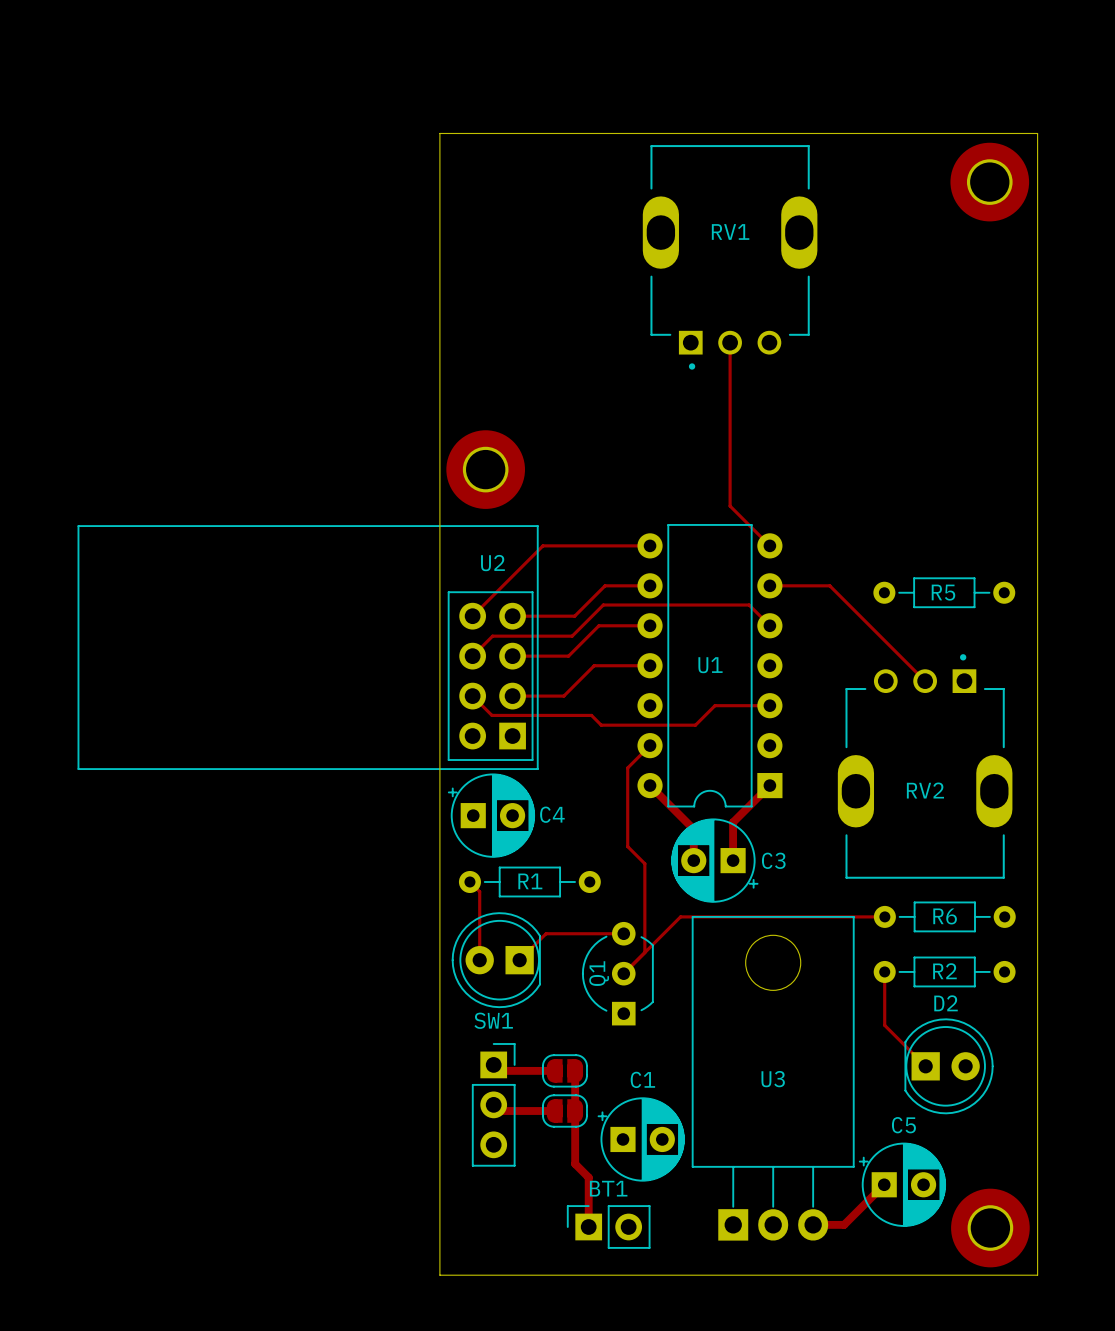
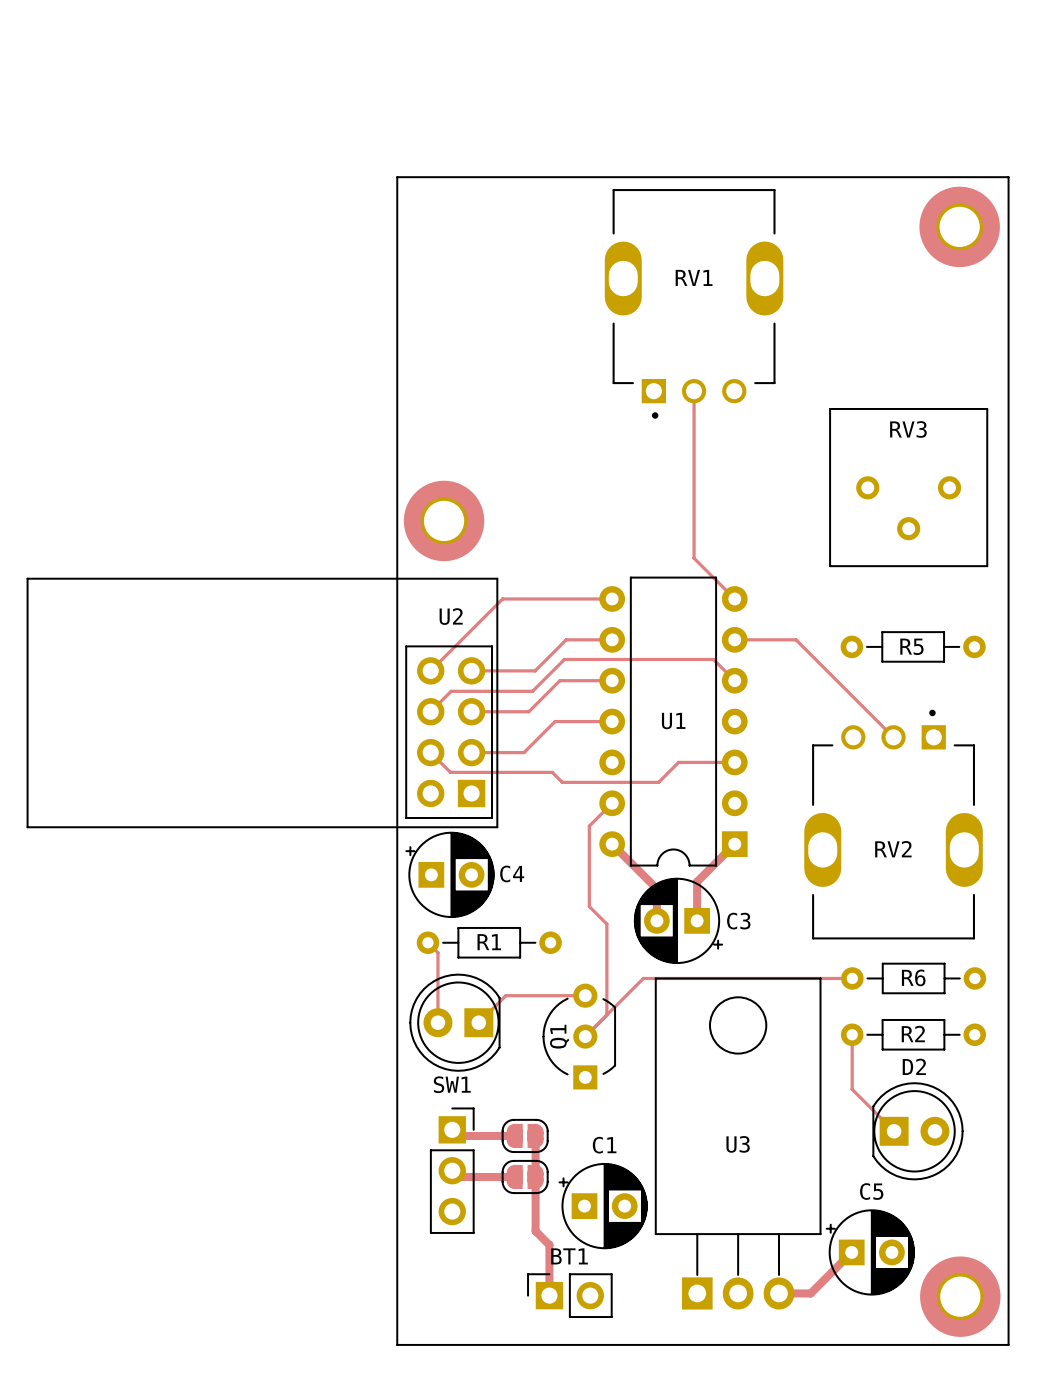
RV3: none -> (908, 487)

